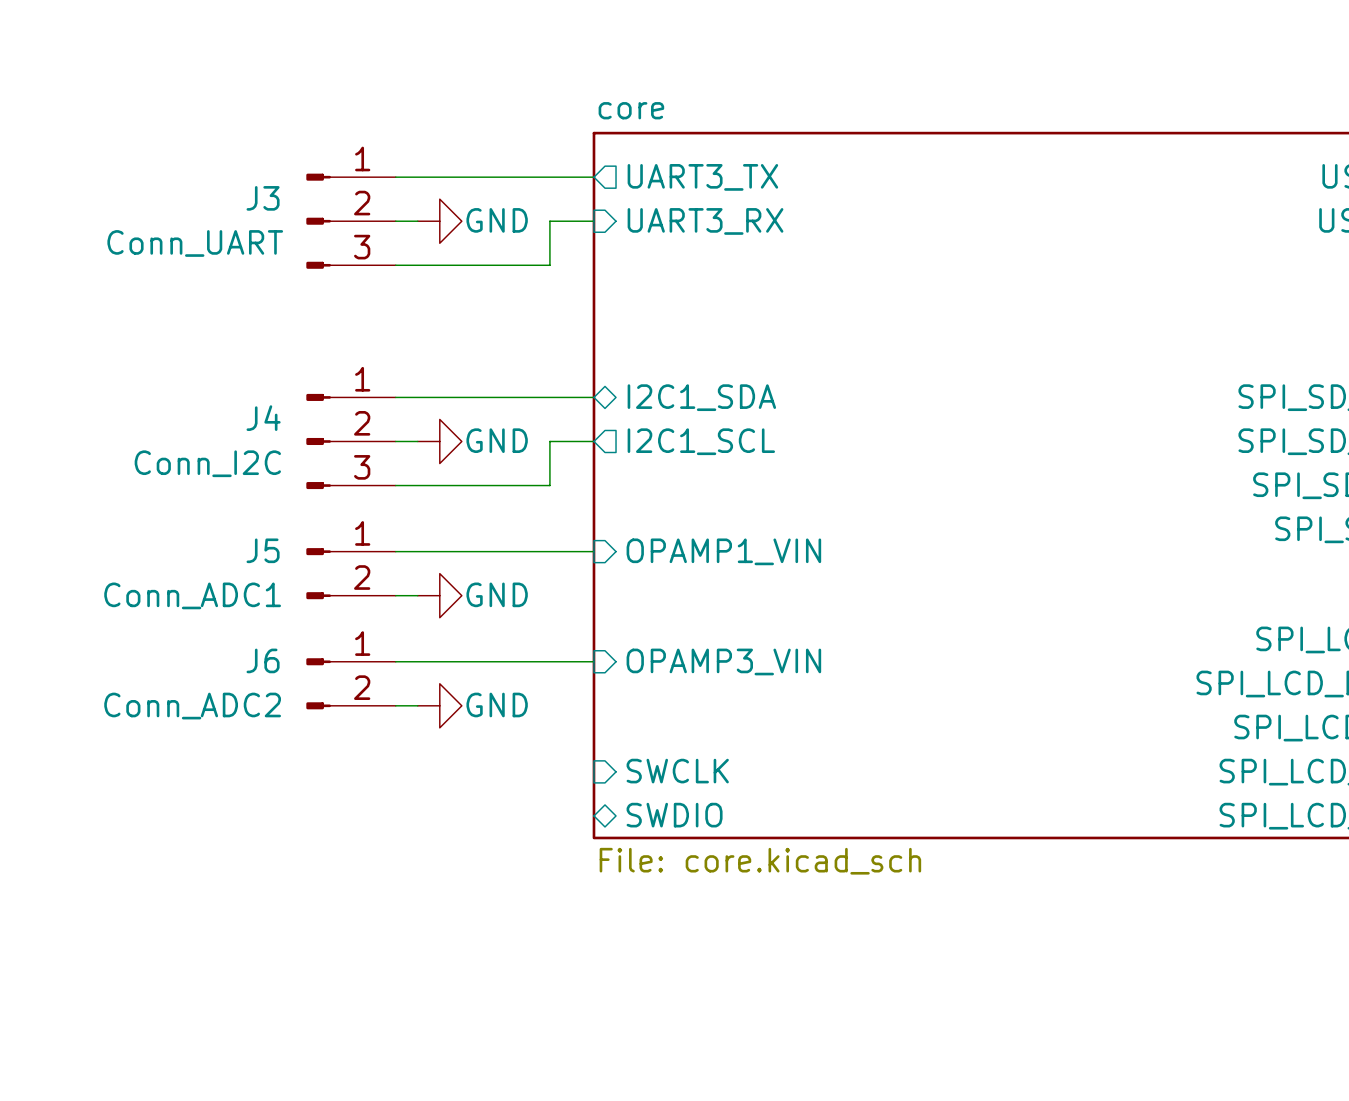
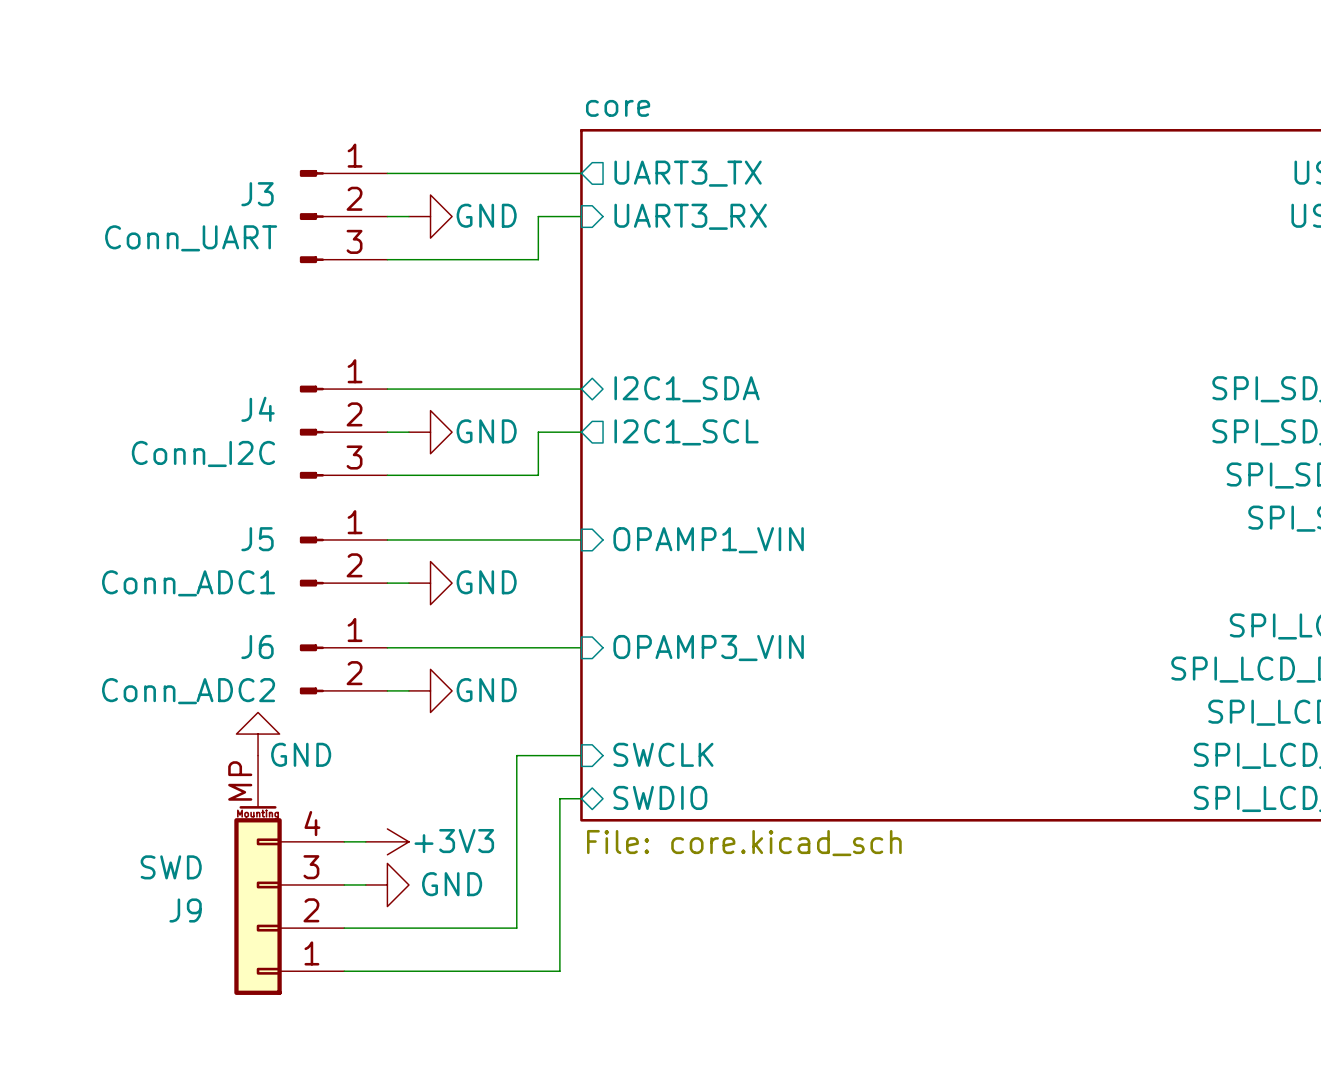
power symbol: none -> GND (258, 734)
wire: none -> (581, 755) (516, 755) (516, 928) (344, 928)
wire: none -> (581, 798) (559, 798) (559, 971) (344, 971)
wire: none -> (344, 841) (365, 841)
power symbol: none -> +3V3 (387, 841)
J9: none -> SWD (289, 875)
wire: none -> (344, 884) (365, 884)
power symbol: none -> GND (387, 884)

